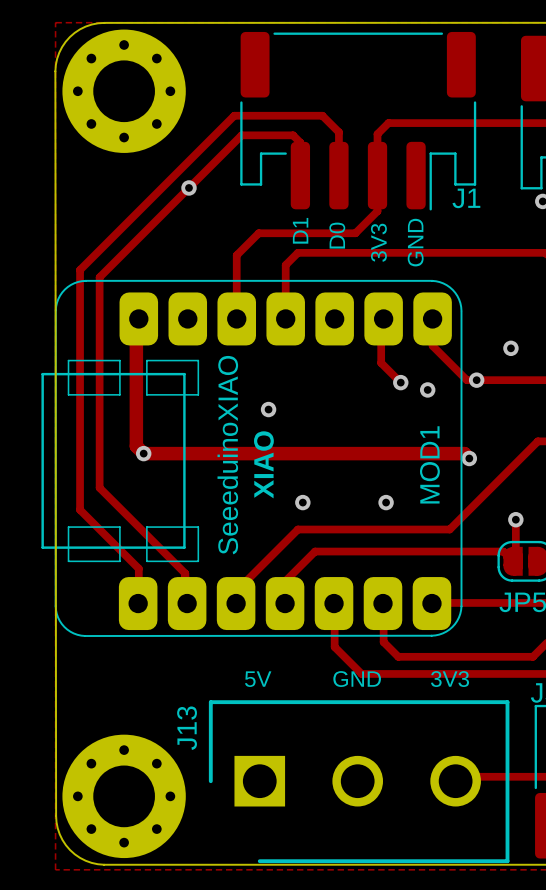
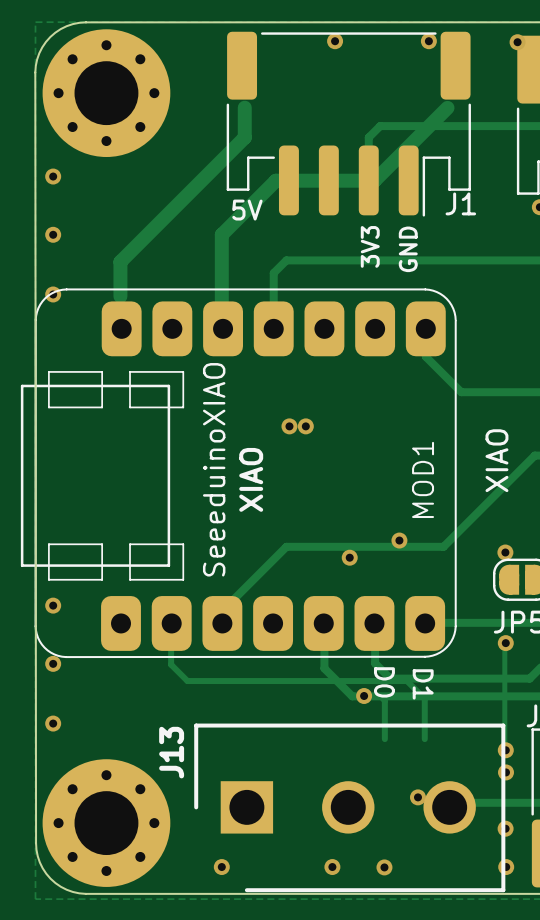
via: none -> (335, 41)
via: none -> (428, 41)
via: none -> (517, 42)
track: none -> (244, 107) (244, 137) (120, 261) (120, 296)
track: none -> (447, 107) (374, 180) (275, 180) (221, 234) (221, 313)
via: none -> (53, 176)
track: (300, 175) (300, 142) (293, 135) (241, 135) (99, 277) (99, 487) (185, 573) (185, 612) -> none
track: (338, 175) (338, 132) (322, 115) (234, 115) (80, 269) (80, 509) (138, 568) (138, 613) -> none
track: (377, 175) (377, 211) (355, 233) (258, 233) (236, 255) (236, 301) -> none
via: (188, 187) -> none
via: none -> (53, 234)
text: D1 (300, 230) -> none
text rotation: 0° (337, 235) -> 180° (384, 682)
text position: D0 (337, 235) -> D0 (384, 682)
via: none -> (53, 294)
track: (138, 301) (136, 304) (136, 446) (143, 453) (464, 453) (469, 458) -> none
track: (381, 301) (381, 363) (400, 382) -> none
via: (510, 348) -> none
via: (476, 380) -> none
via: (400, 382) -> none
via: (427, 389) -> none
via: (268, 409) -> none
via: none -> (289, 426)
via: none -> (305, 426)
text: none -> XIAO (496, 460)
via: (143, 453) -> none
via: (469, 458) -> none
via: (302, 502) -> none
via: (386, 502) -> none
track: (515, 519) (515, 558) (513, 561) (503, 551) (315, 551) (285, 580) (285, 613) -> none
via position: (515, 519) -> (505, 552)
via: none -> (399, 540)
via: none -> (349, 557)
via: none -> (53, 605)
track: none -> (171, 633) (171, 664) (187, 681) (407, 681) (424, 698) (424, 739)
track: none -> (505, 643) (505, 750)
via: none -> (505, 643)
via: none -> (53, 663)
text: none -> D1 (423, 684)
via: none -> (364, 696)
track: none -> (370, 696) (364, 696) (380, 696) (384, 700) (384, 739)
text position: 5V (258, 679) -> 5V (247, 210)
text: GND (357, 679) -> none
text: 3V3 (450, 679) -> none
via: none -> (53, 723)
via: none -> (505, 750)
via: none -> (506, 772)
via: none -> (417, 797)
via: none -> (505, 828)
via: none -> (221, 867)
via: none -> (332, 867)
via: none -> (506, 867)
via: none -> (384, 867)

